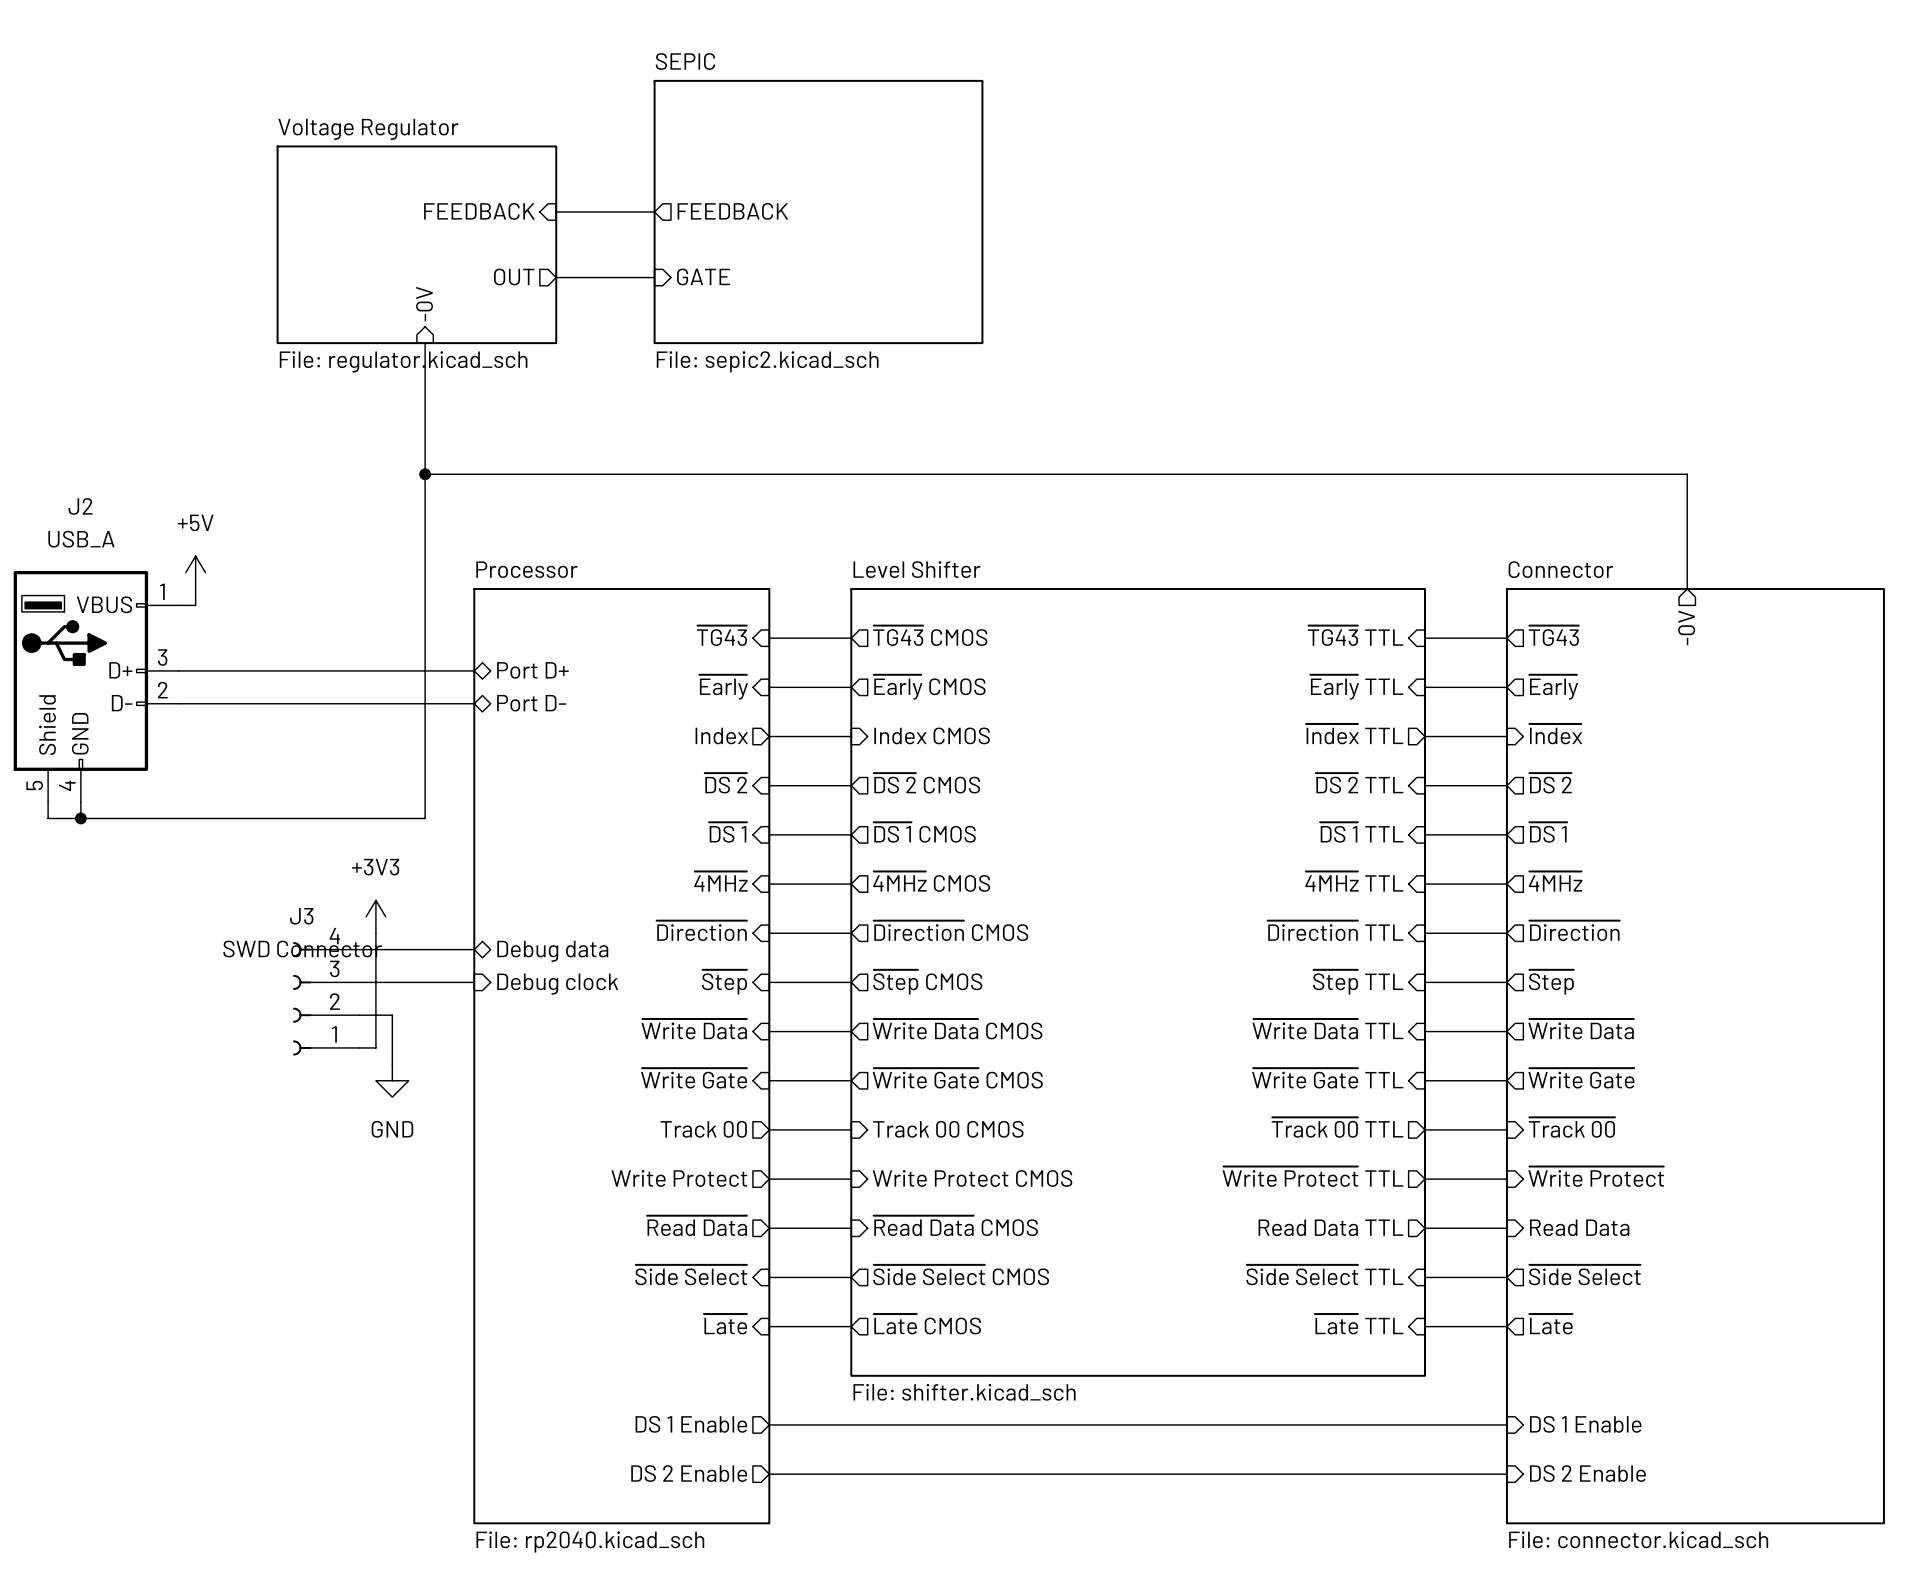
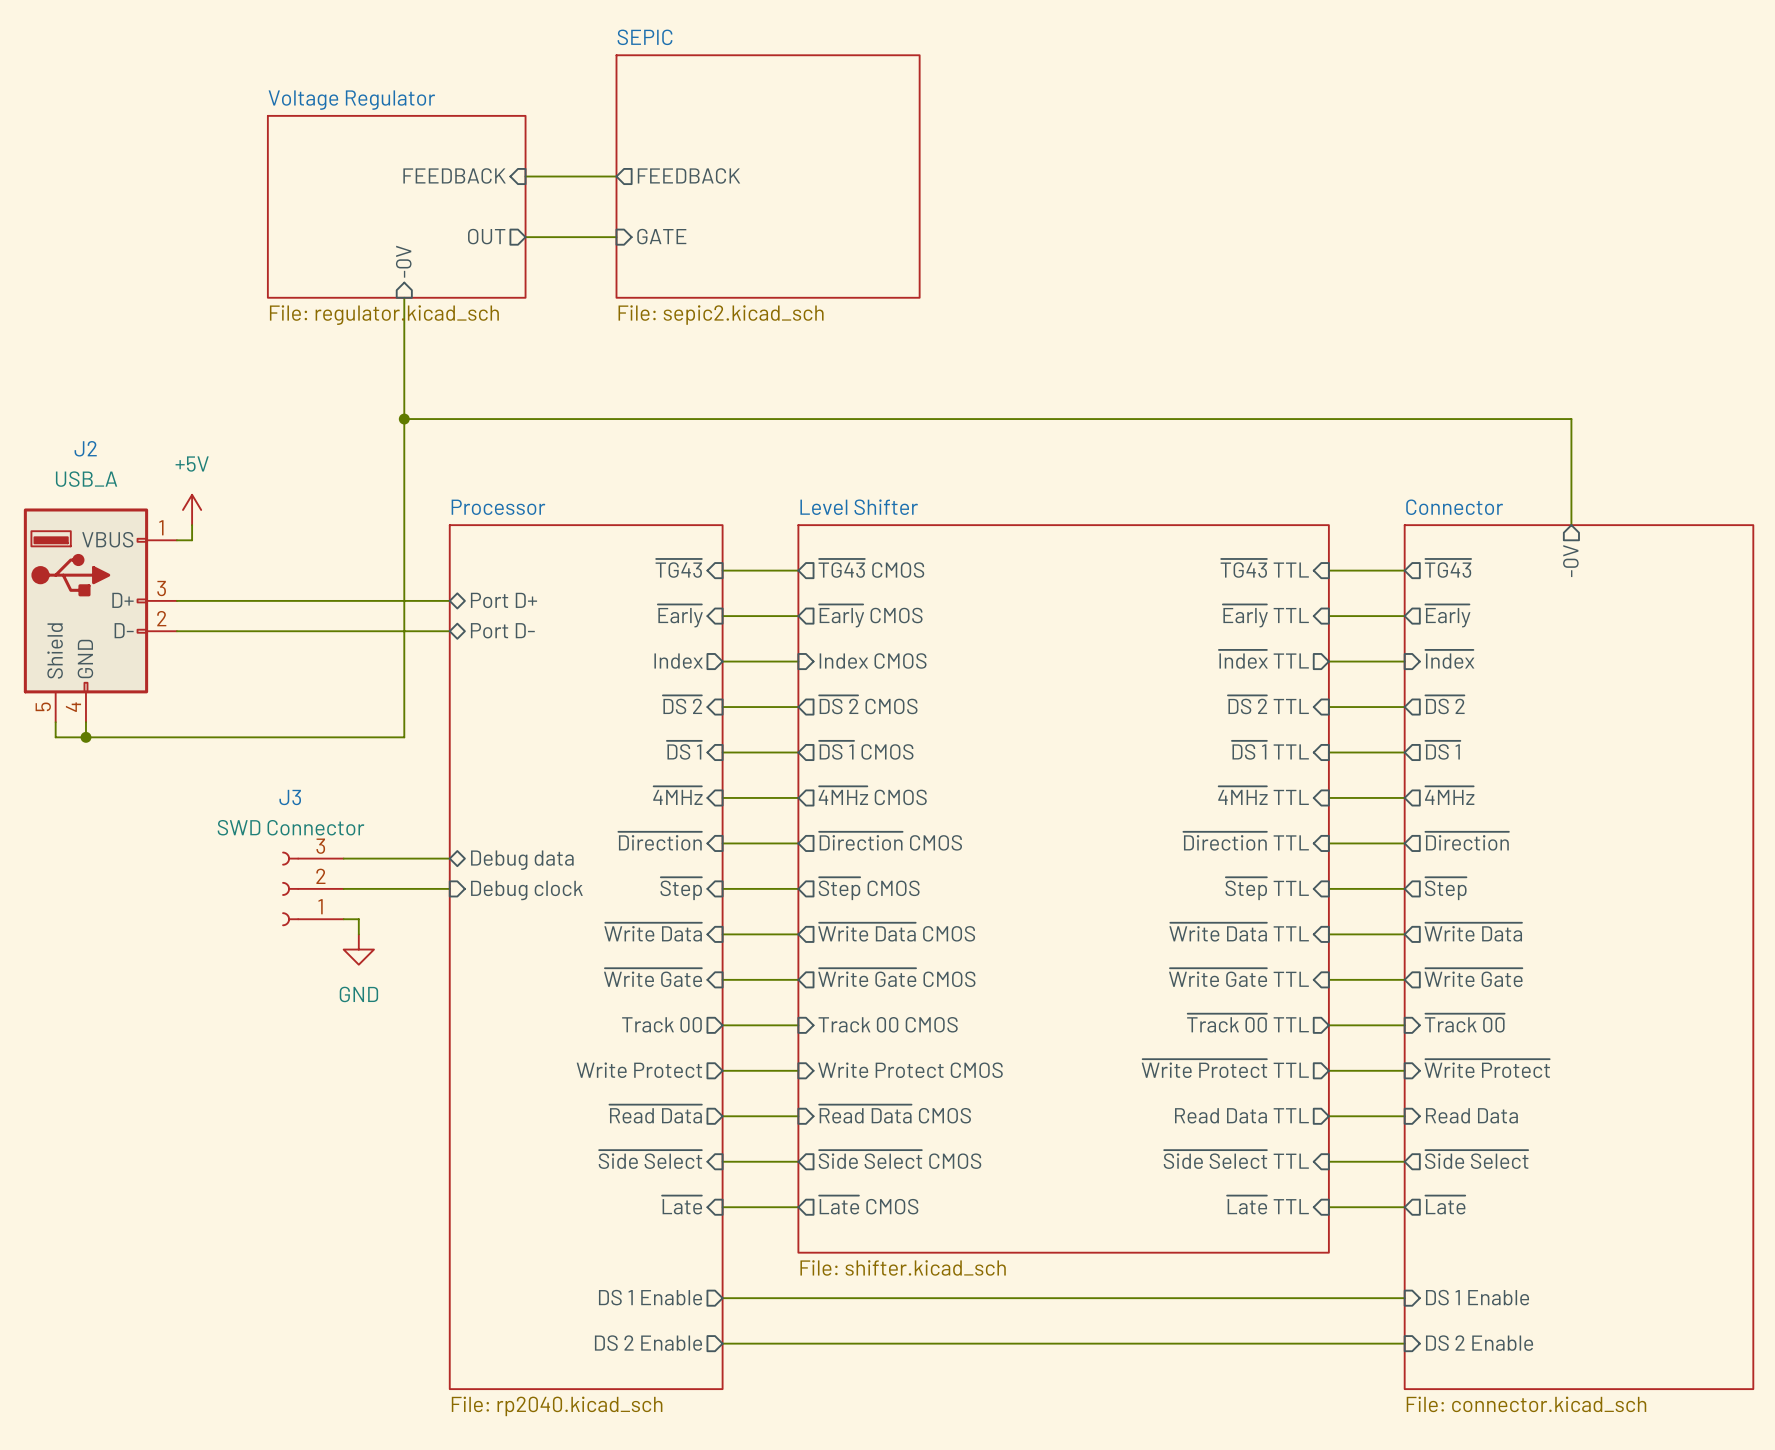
power symbol: +3V3 (375, 916) -> none
wire: (375, 933) (375, 1015) (392, 1015) (392, 1064) -> none
J3 symbol: [292, 942, 360, 1056] -> [282, 851, 344, 927]
power symbol position: GND (392, 1080) -> GND (358, 949)

